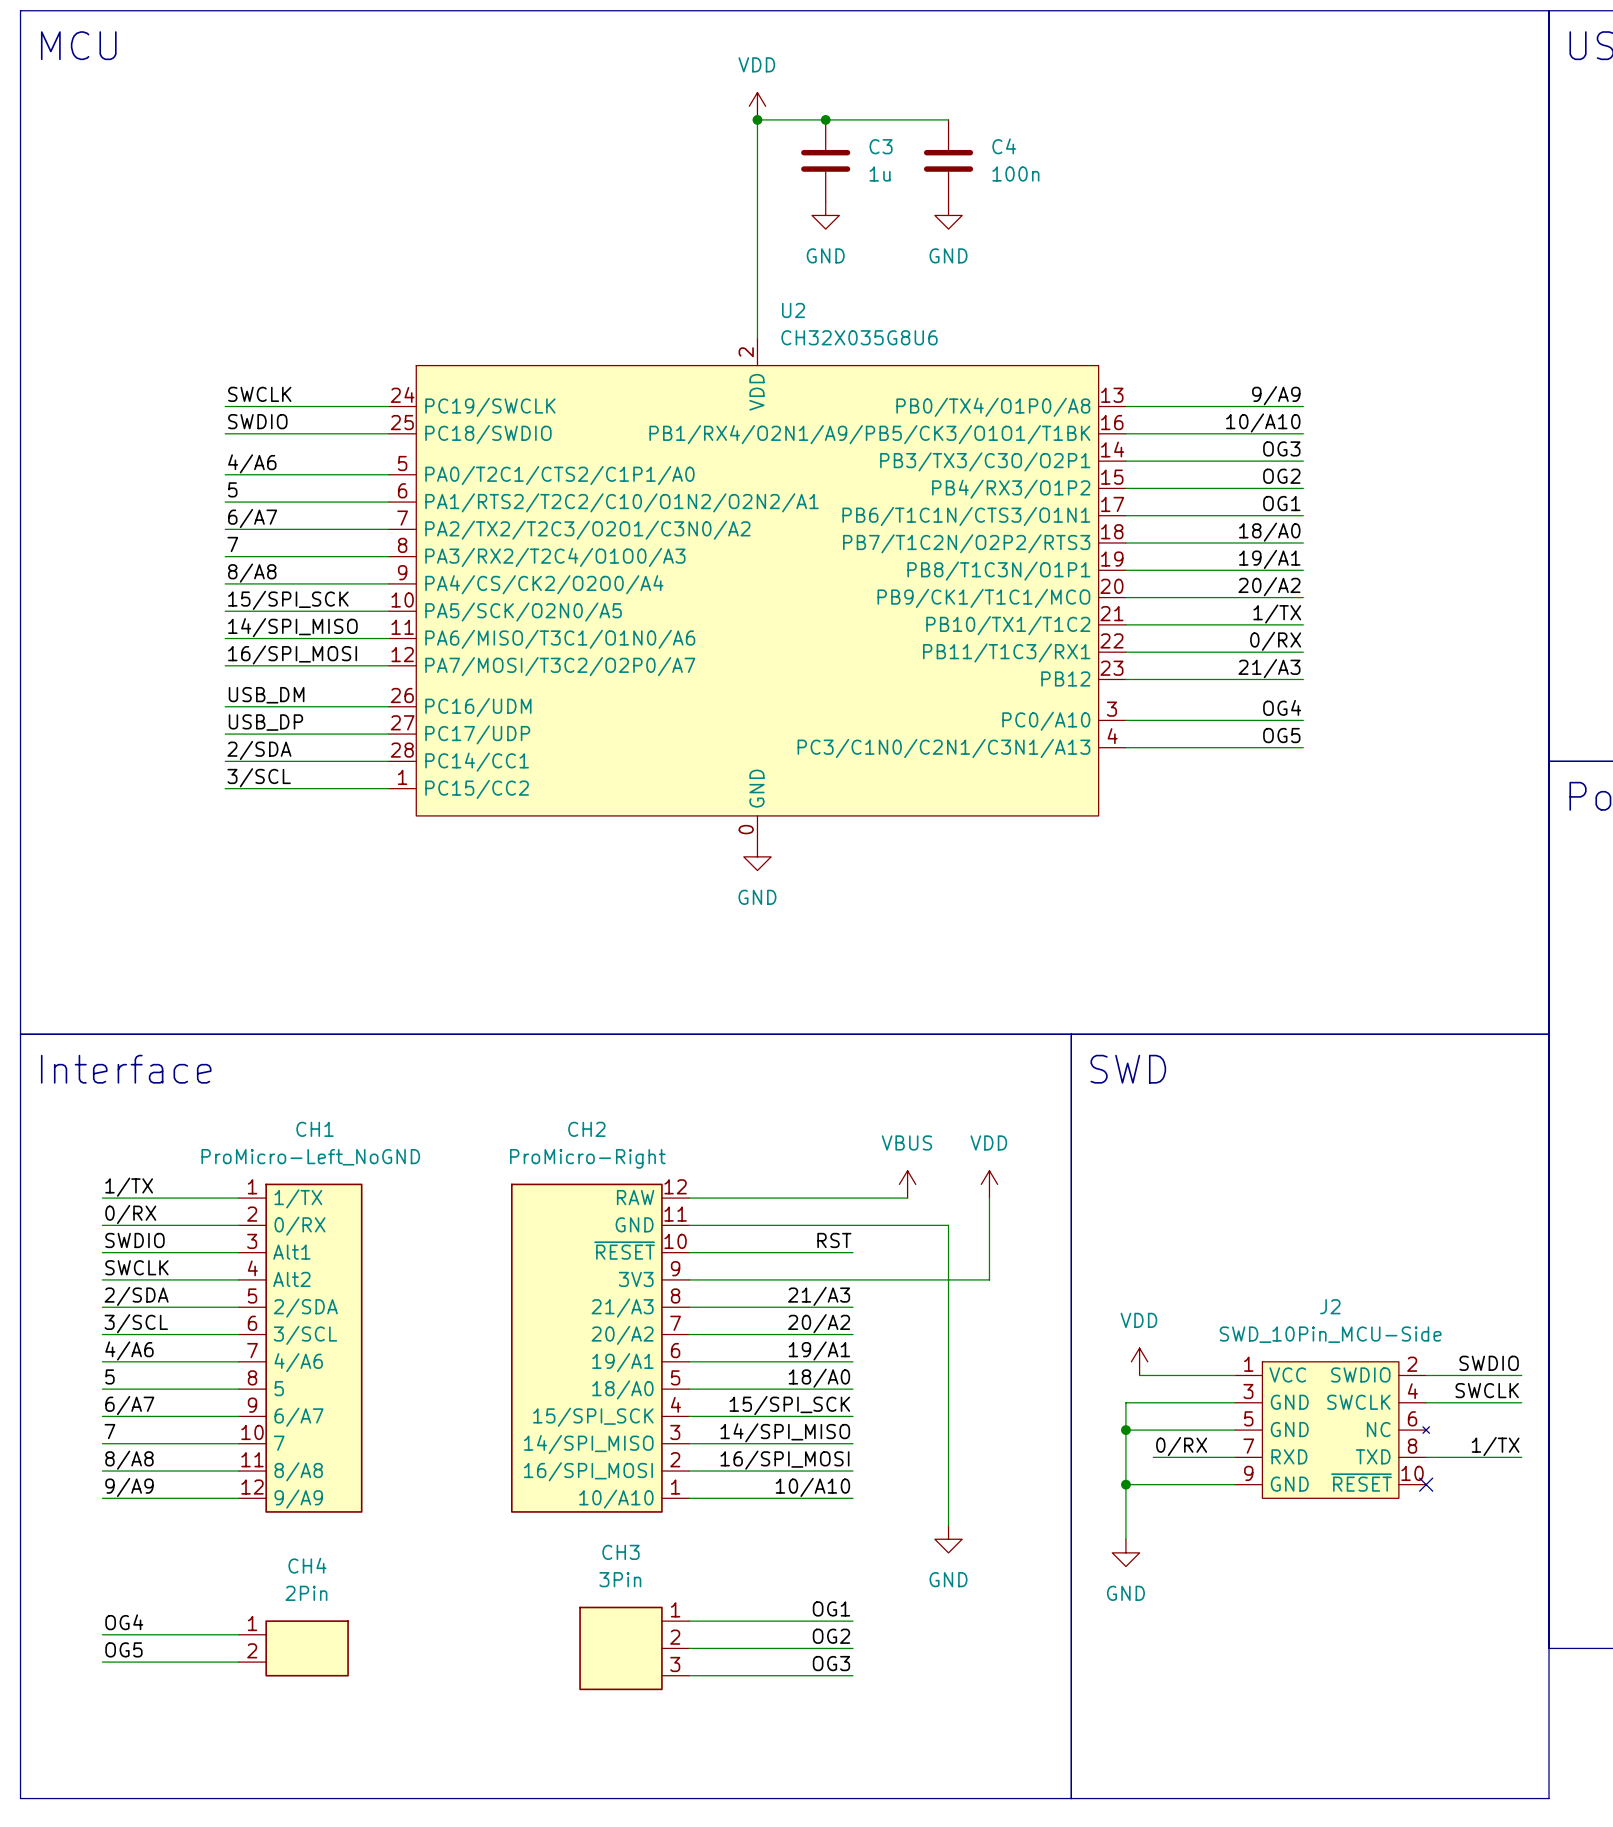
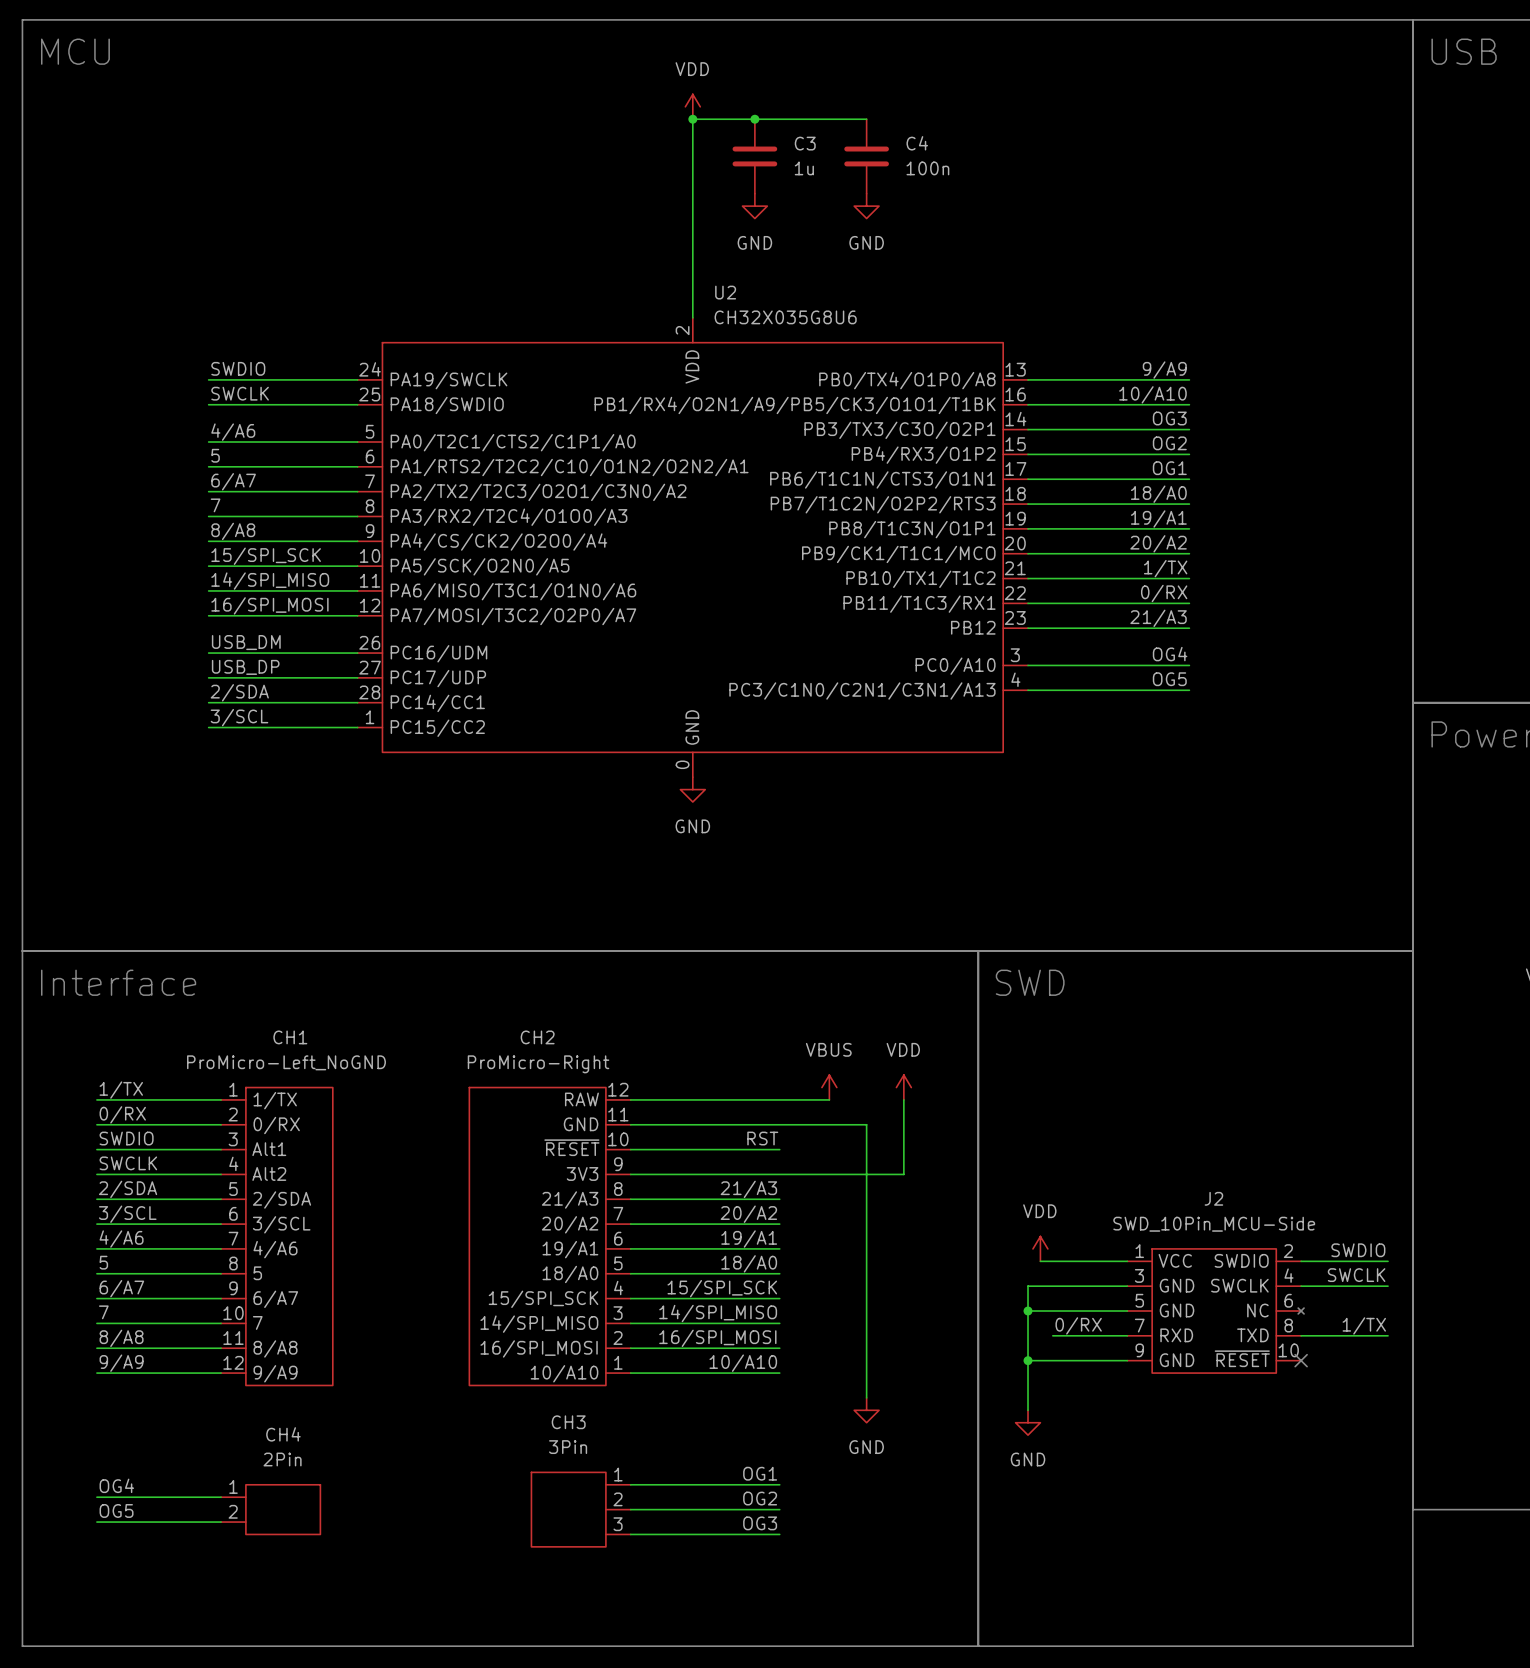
label: SWCLK (259, 394) -> SWDIO (238, 368)
U2 pin name: PC19/SWCLK (490, 407) -> PA19/SWCLK (449, 380)
label: SWDIO (257, 421) -> SWCLK (240, 393)
U2 pin name: PC18/SWDIO (488, 434) -> PA18/SWDIO (447, 405)

